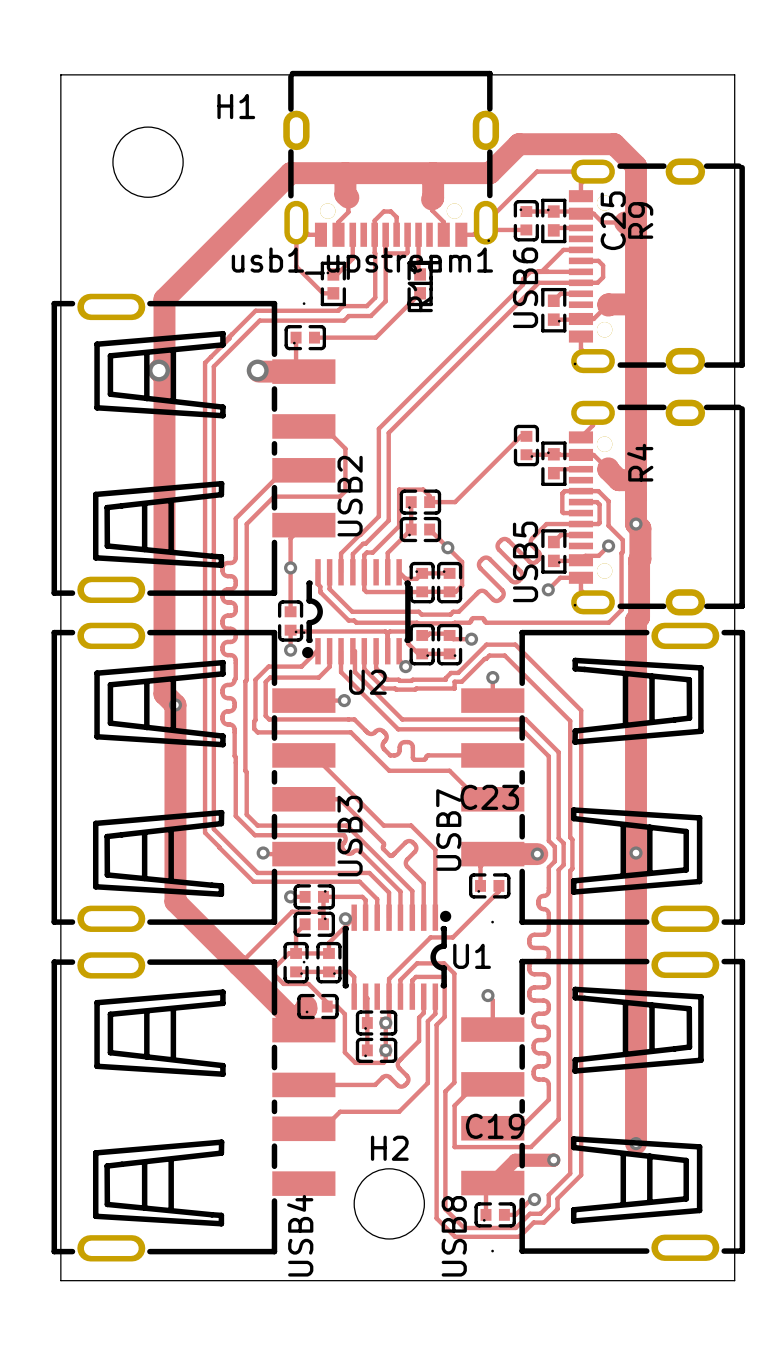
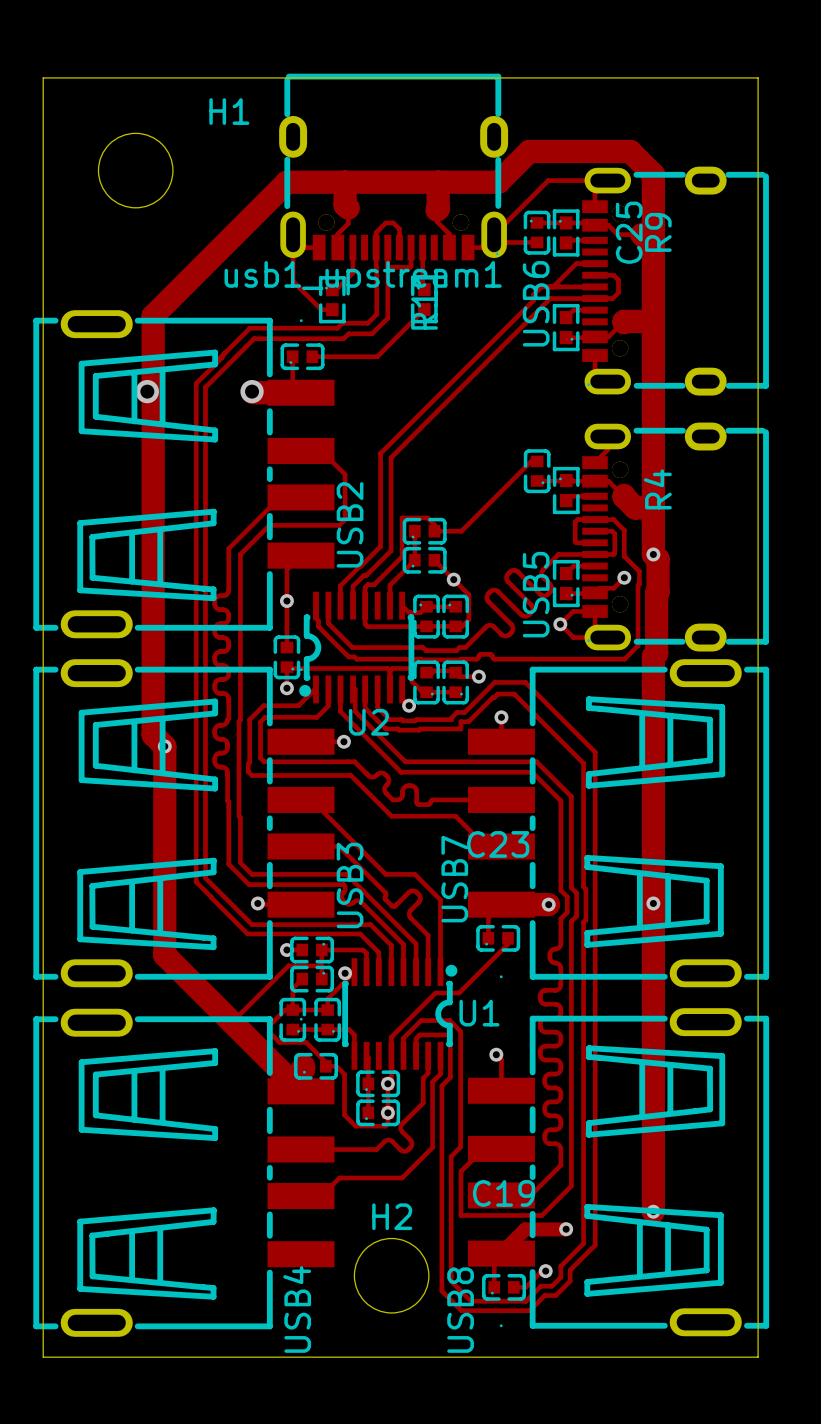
track: none -> (560, 624) (573, 637) (607, 637)

